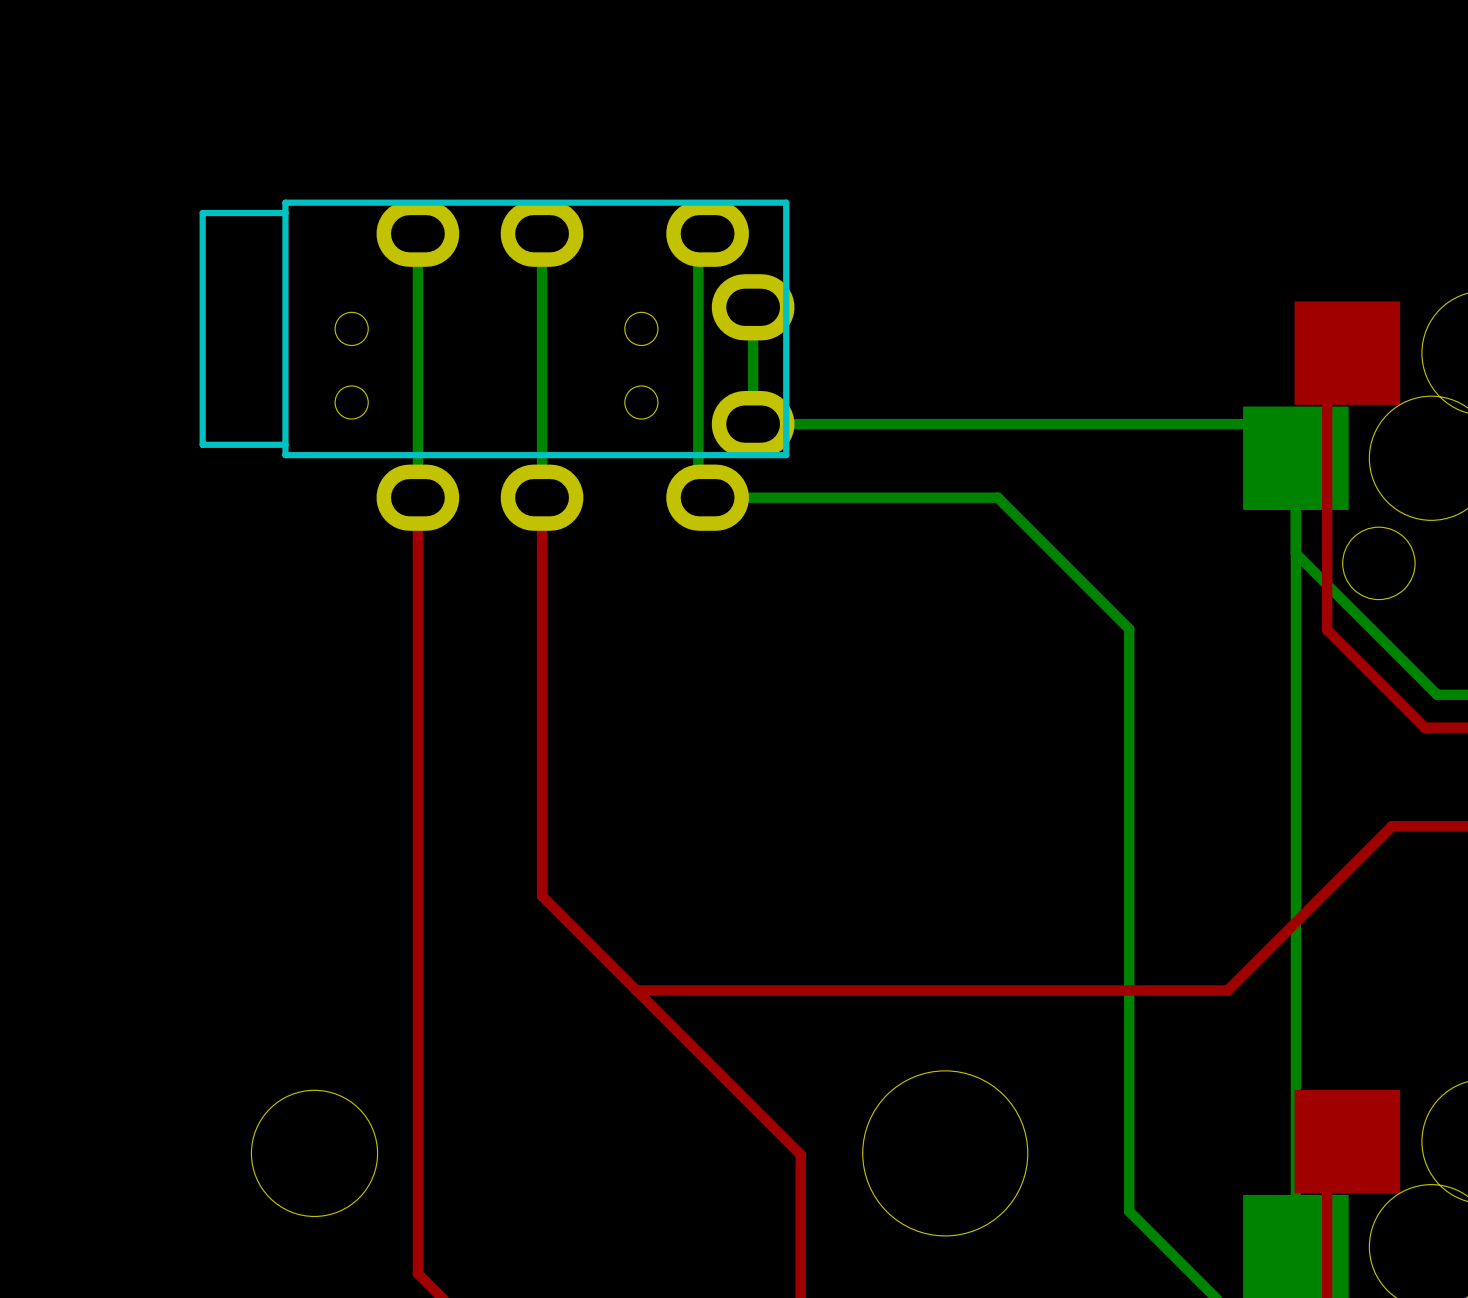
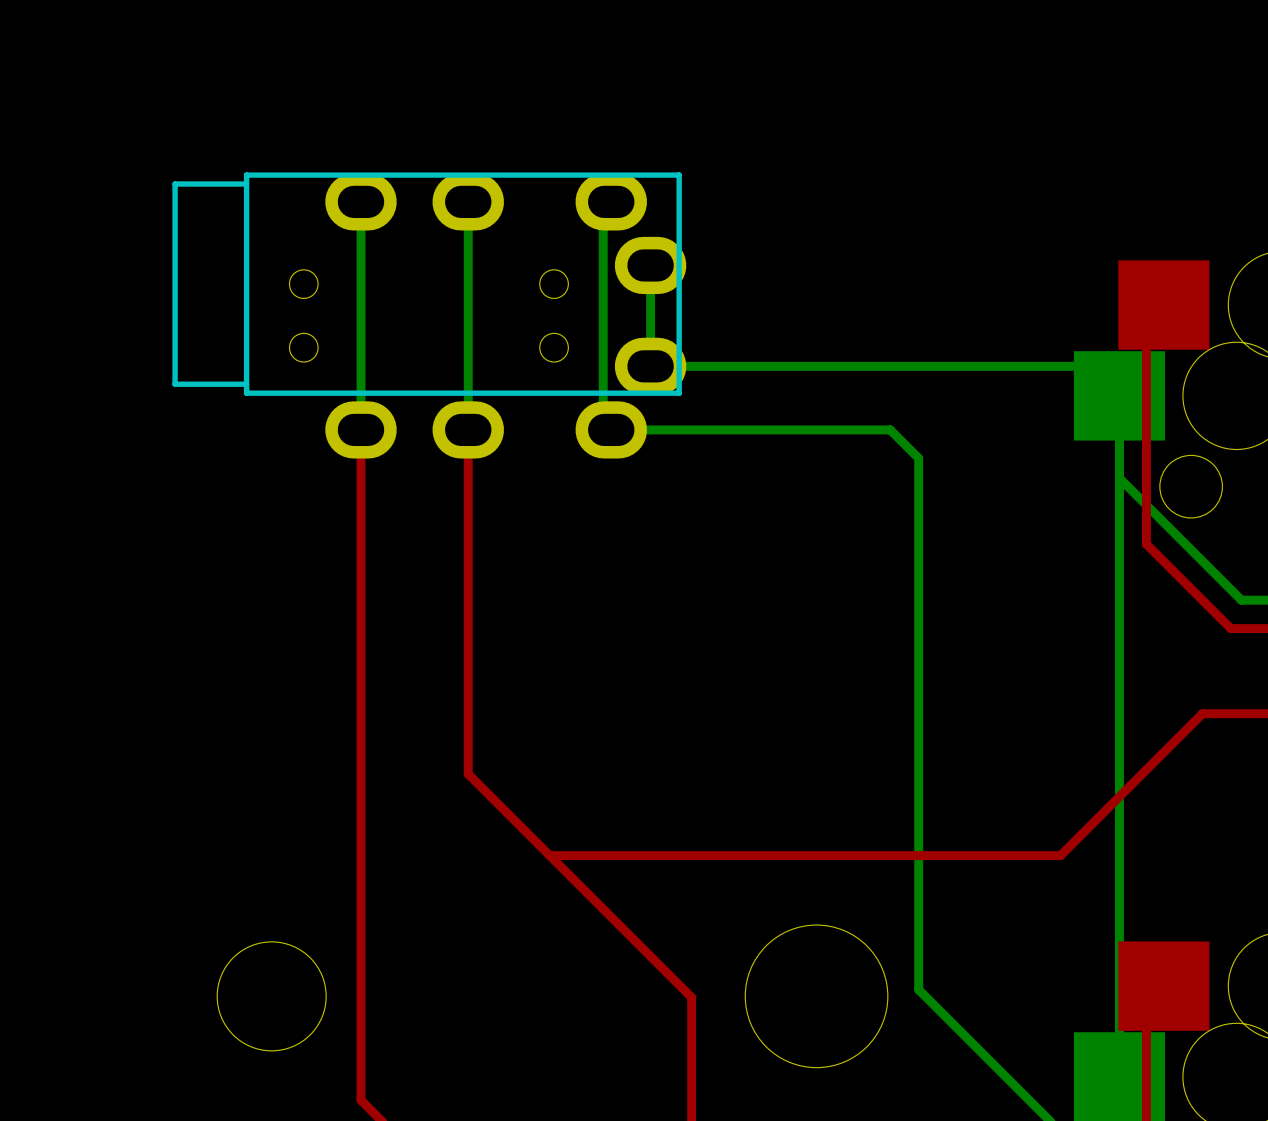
bottom track: (997, 497) (1129, 629) (1129, 1211) -> (861, 429) (890, 429) (918, 458) (918, 989) (975, 1046)

